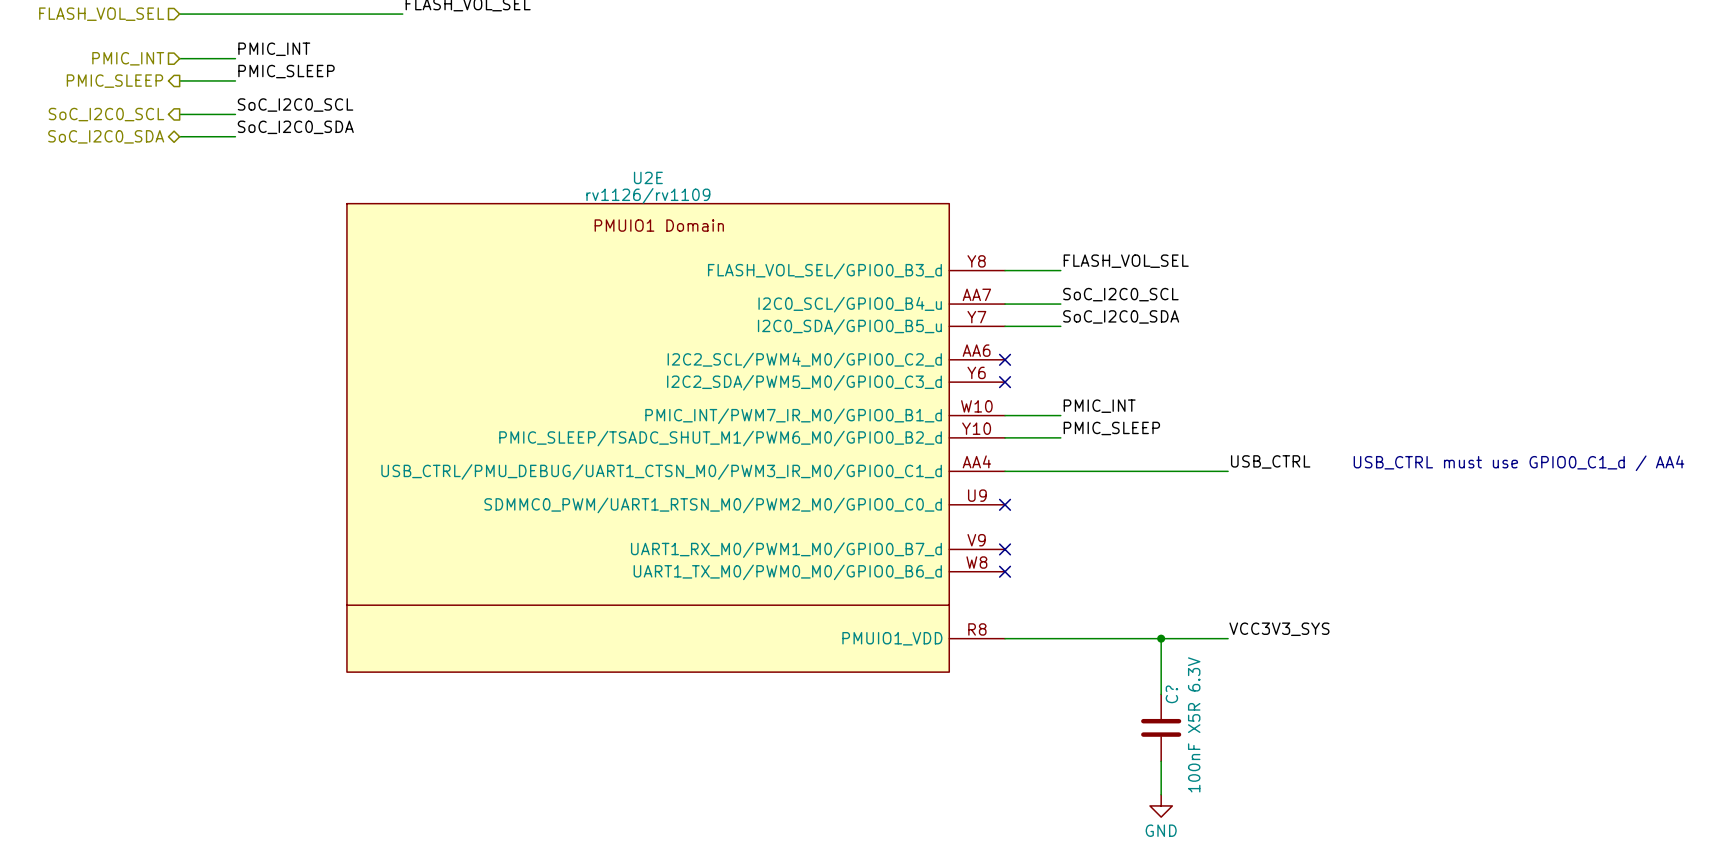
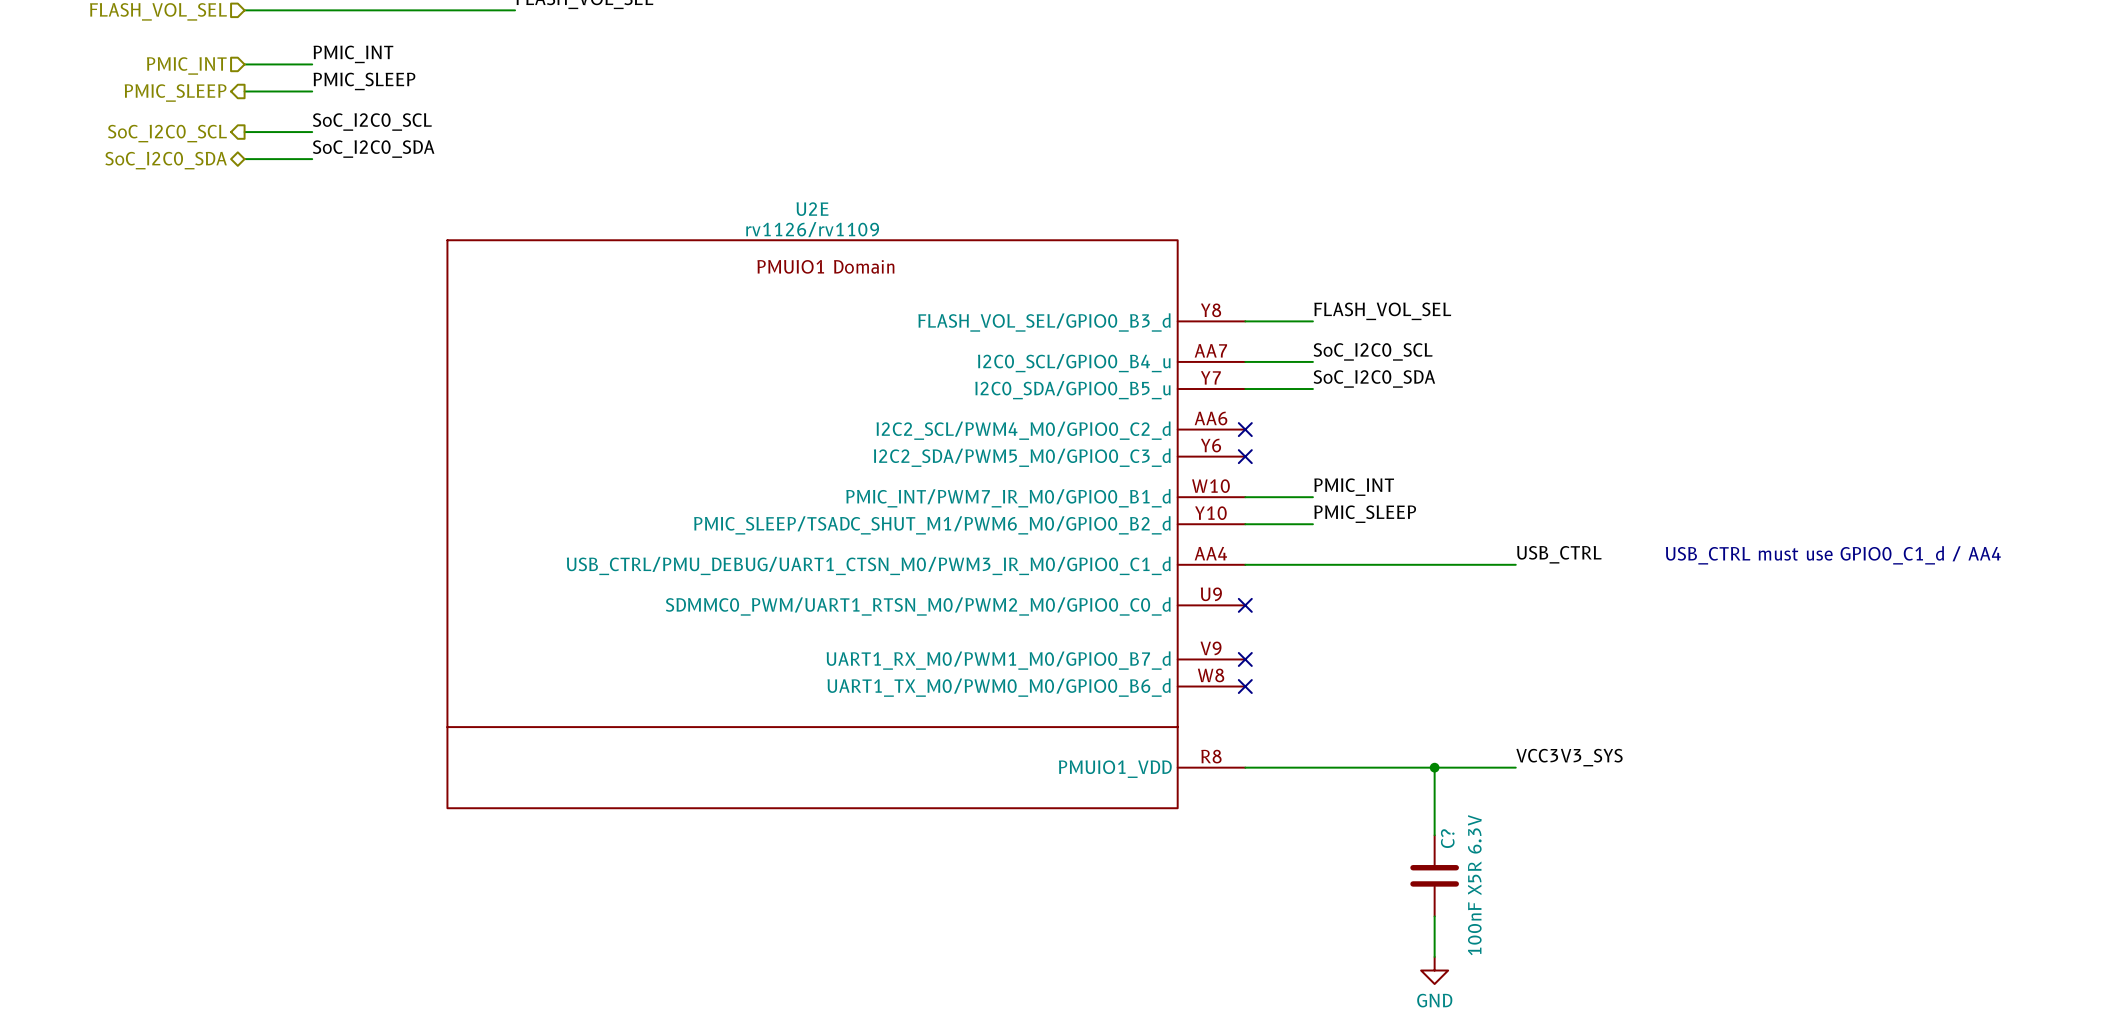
U2E symbol: [346, 203, 1006, 673] -> [447, 240, 1246, 809]

